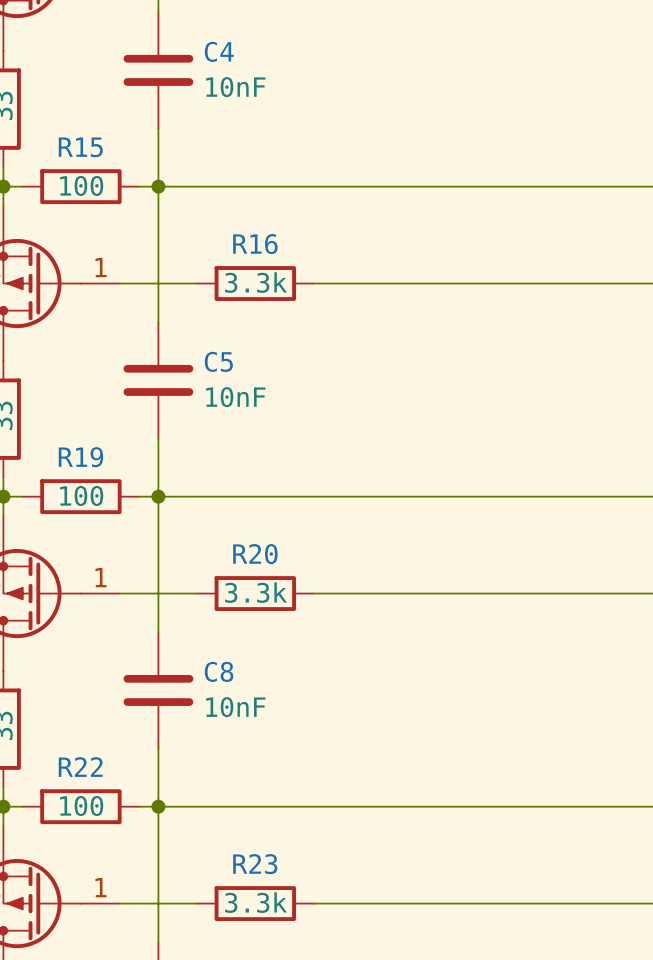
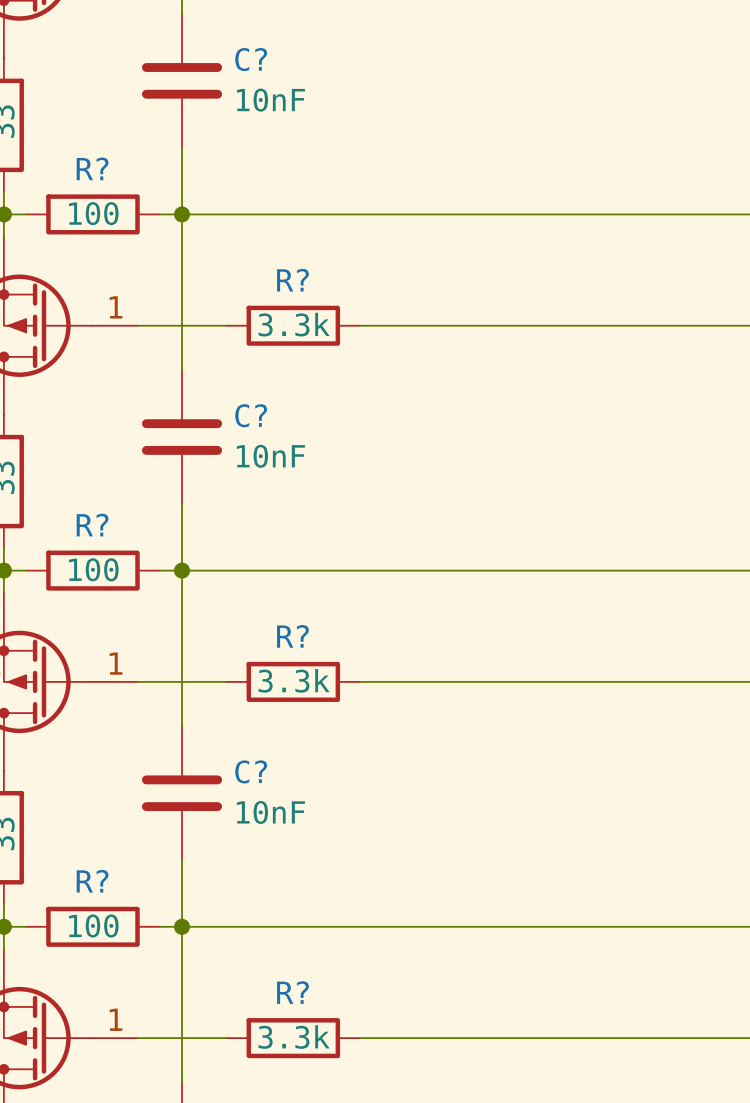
C4 name: C4 (219, 51) -> C? (251, 59)
R15 name: R15 (80, 147) -> R? (92, 168)
R16 name: R16 (255, 244) -> R? (292, 280)
C5 name: C5 (218, 361) -> C? (251, 415)
R19 name: R19 (80, 457) -> R? (92, 525)
R20 name: R20 (255, 554) -> R? (292, 636)
C8 name: C8 (219, 671) -> C? (251, 771)
R22 name: R22 (80, 767) -> R? (92, 881)
R23 name: R23 (255, 864) -> R? (292, 992)

